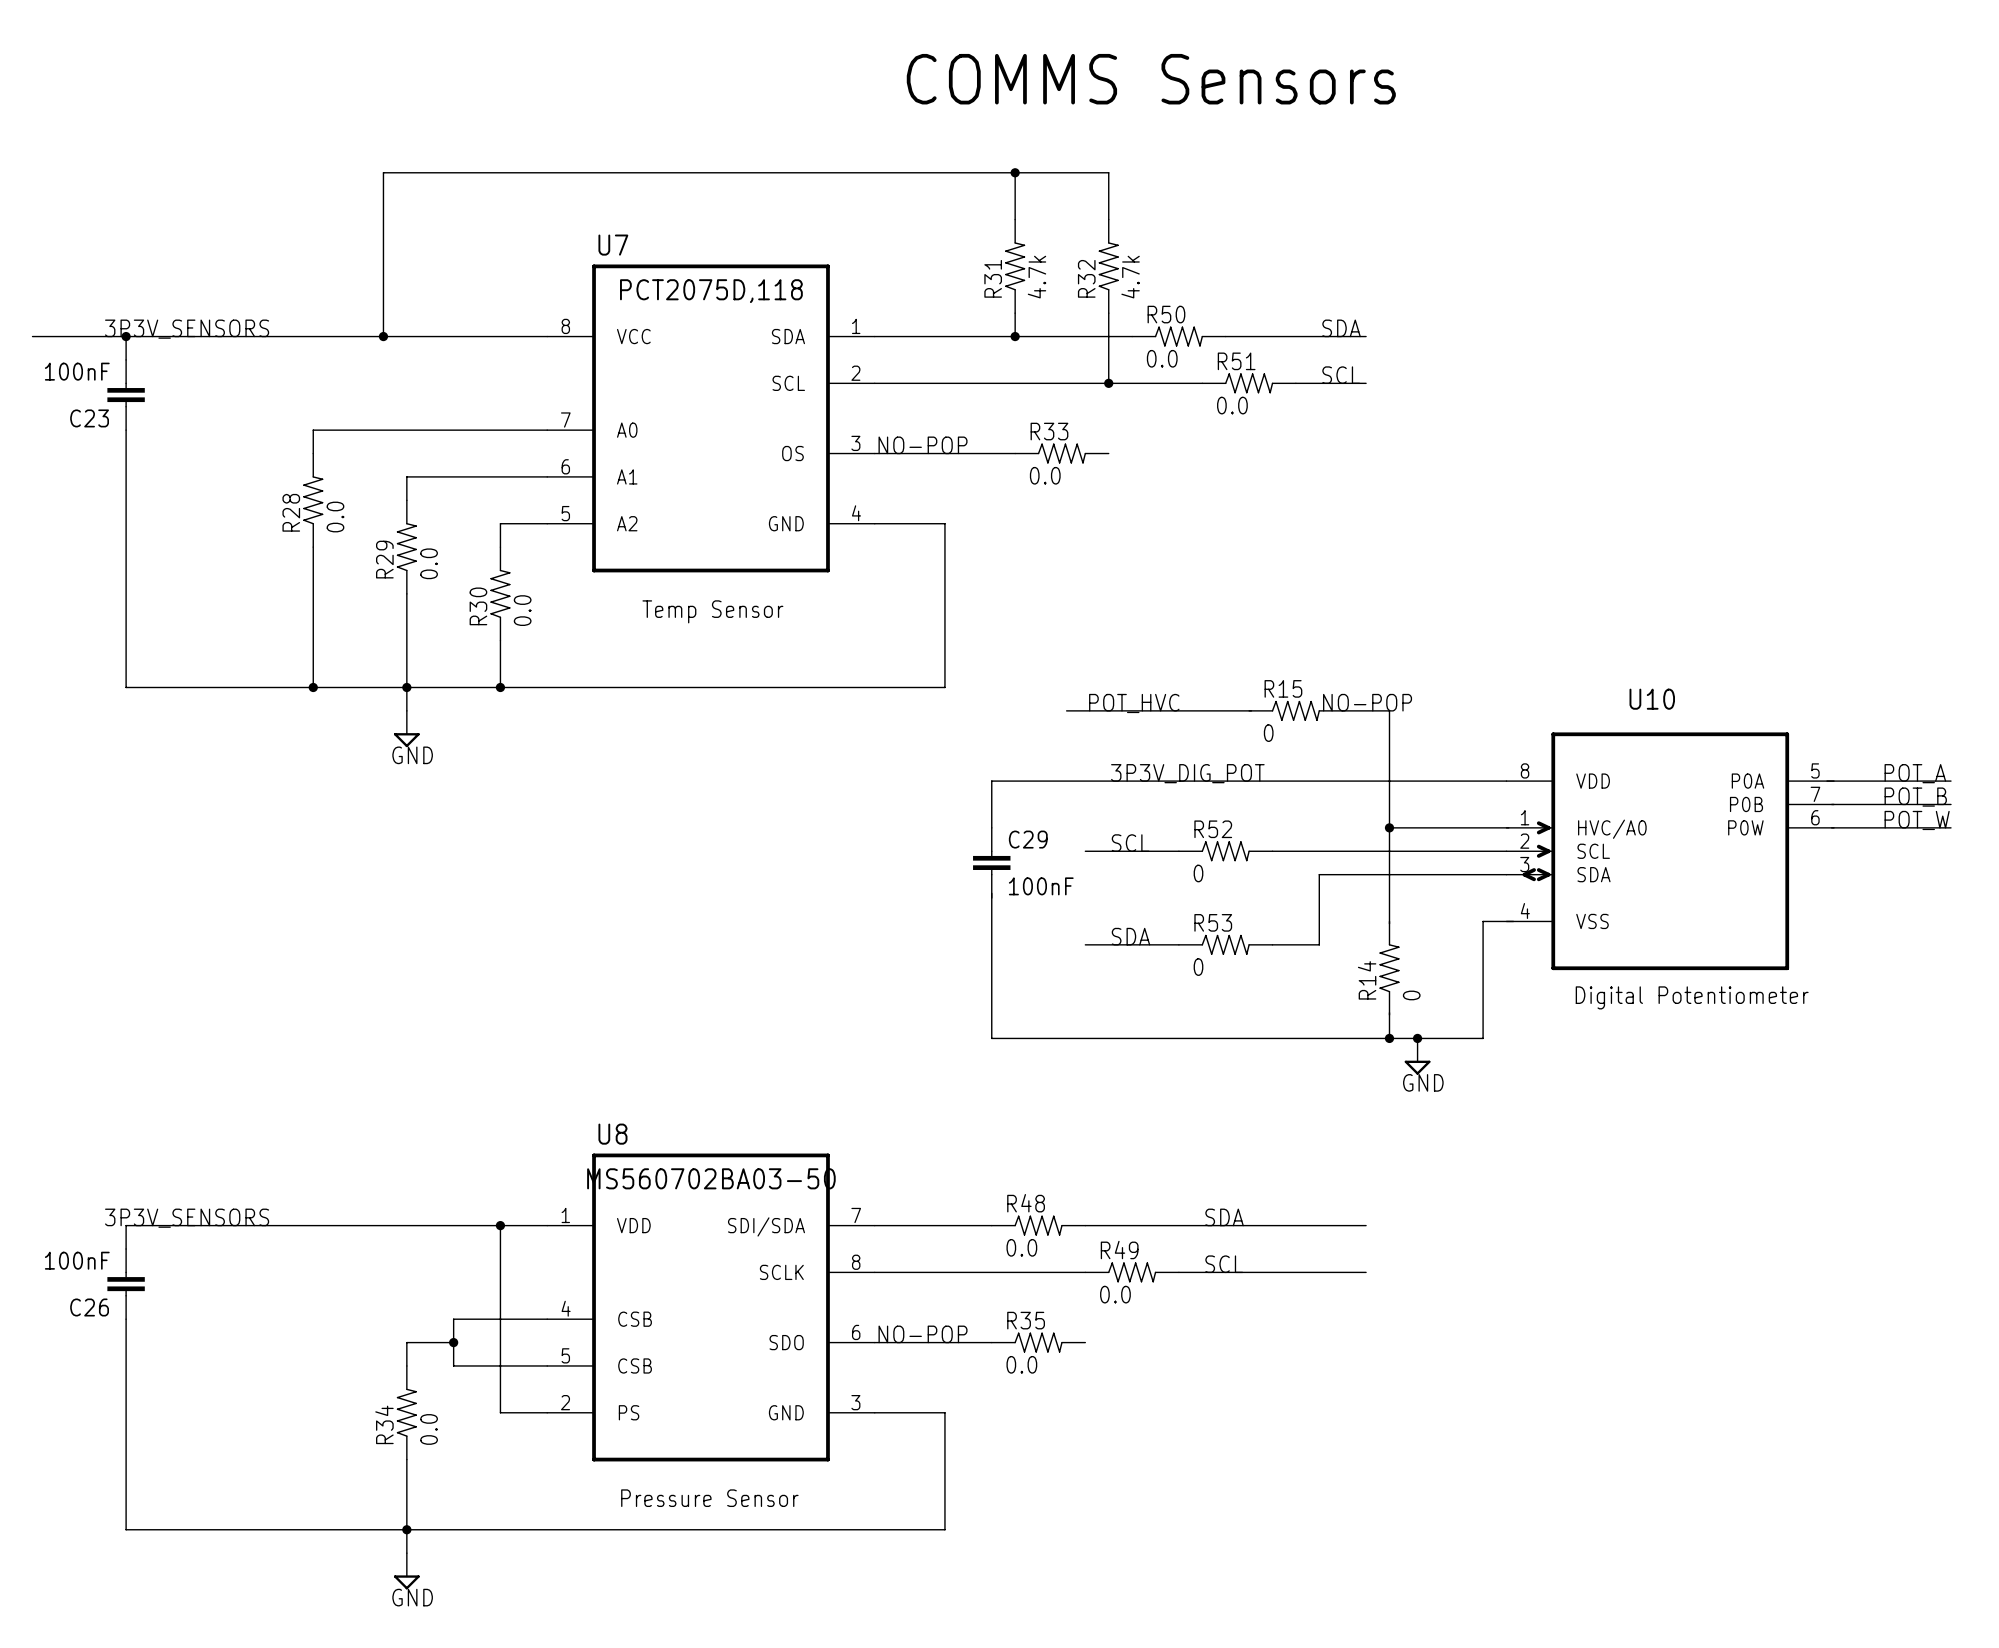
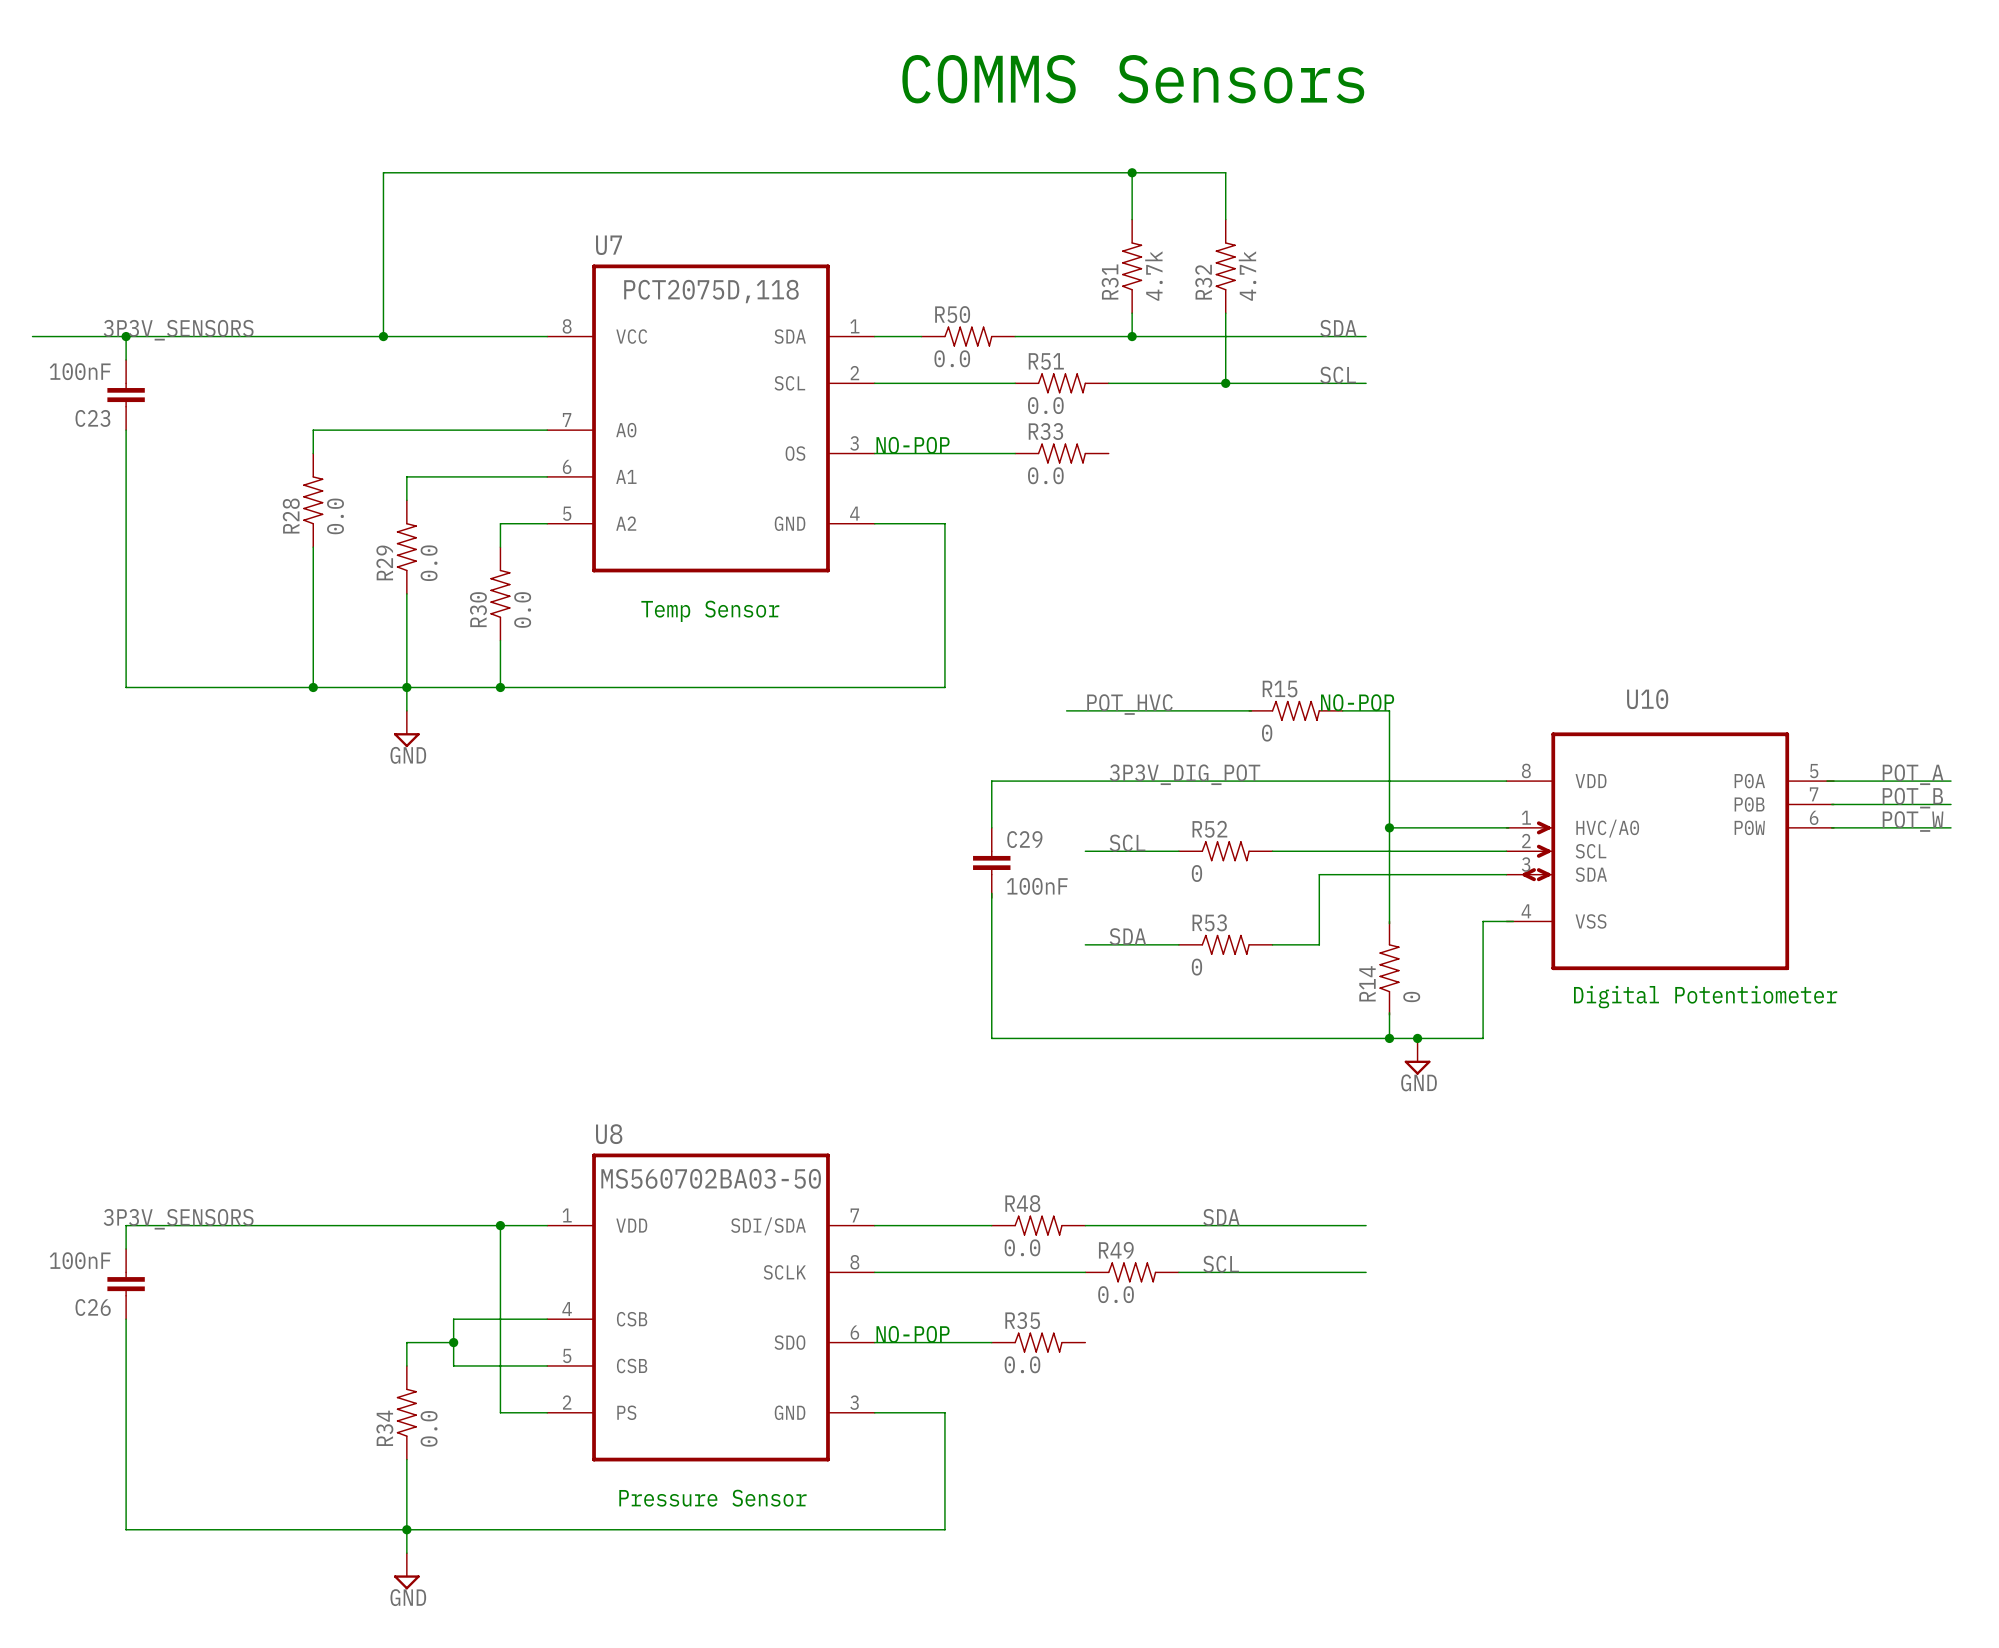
wire: (1015, 172) (1015, 219) -> (1132, 172) (1132, 219)
junction: (1015, 172) -> none
wire: (1108, 172) (1108, 219) -> (1108, 172) (1225, 172) (1225, 219)
junction: none -> (1132, 172)
R31 position: (1015, 266) -> (1132, 266)
R32 position: (1108, 266) -> (1225, 266)
wire: (1015, 313) (1015, 336) (921, 336) -> none
wire: (1108, 313) (1108, 383) (1015, 383) -> none
wire: none -> (1132, 313) (1132, 336) (1225, 336)
wire: none -> (1225, 313) (1225, 383)
junction: (1015, 336) -> none
R50 position: (1178, 336) -> (968, 336)
junction position: (1108, 383) -> (1132, 336)
junction: none -> (1225, 383)
R51 position: (1249, 383) -> (1061, 383)

